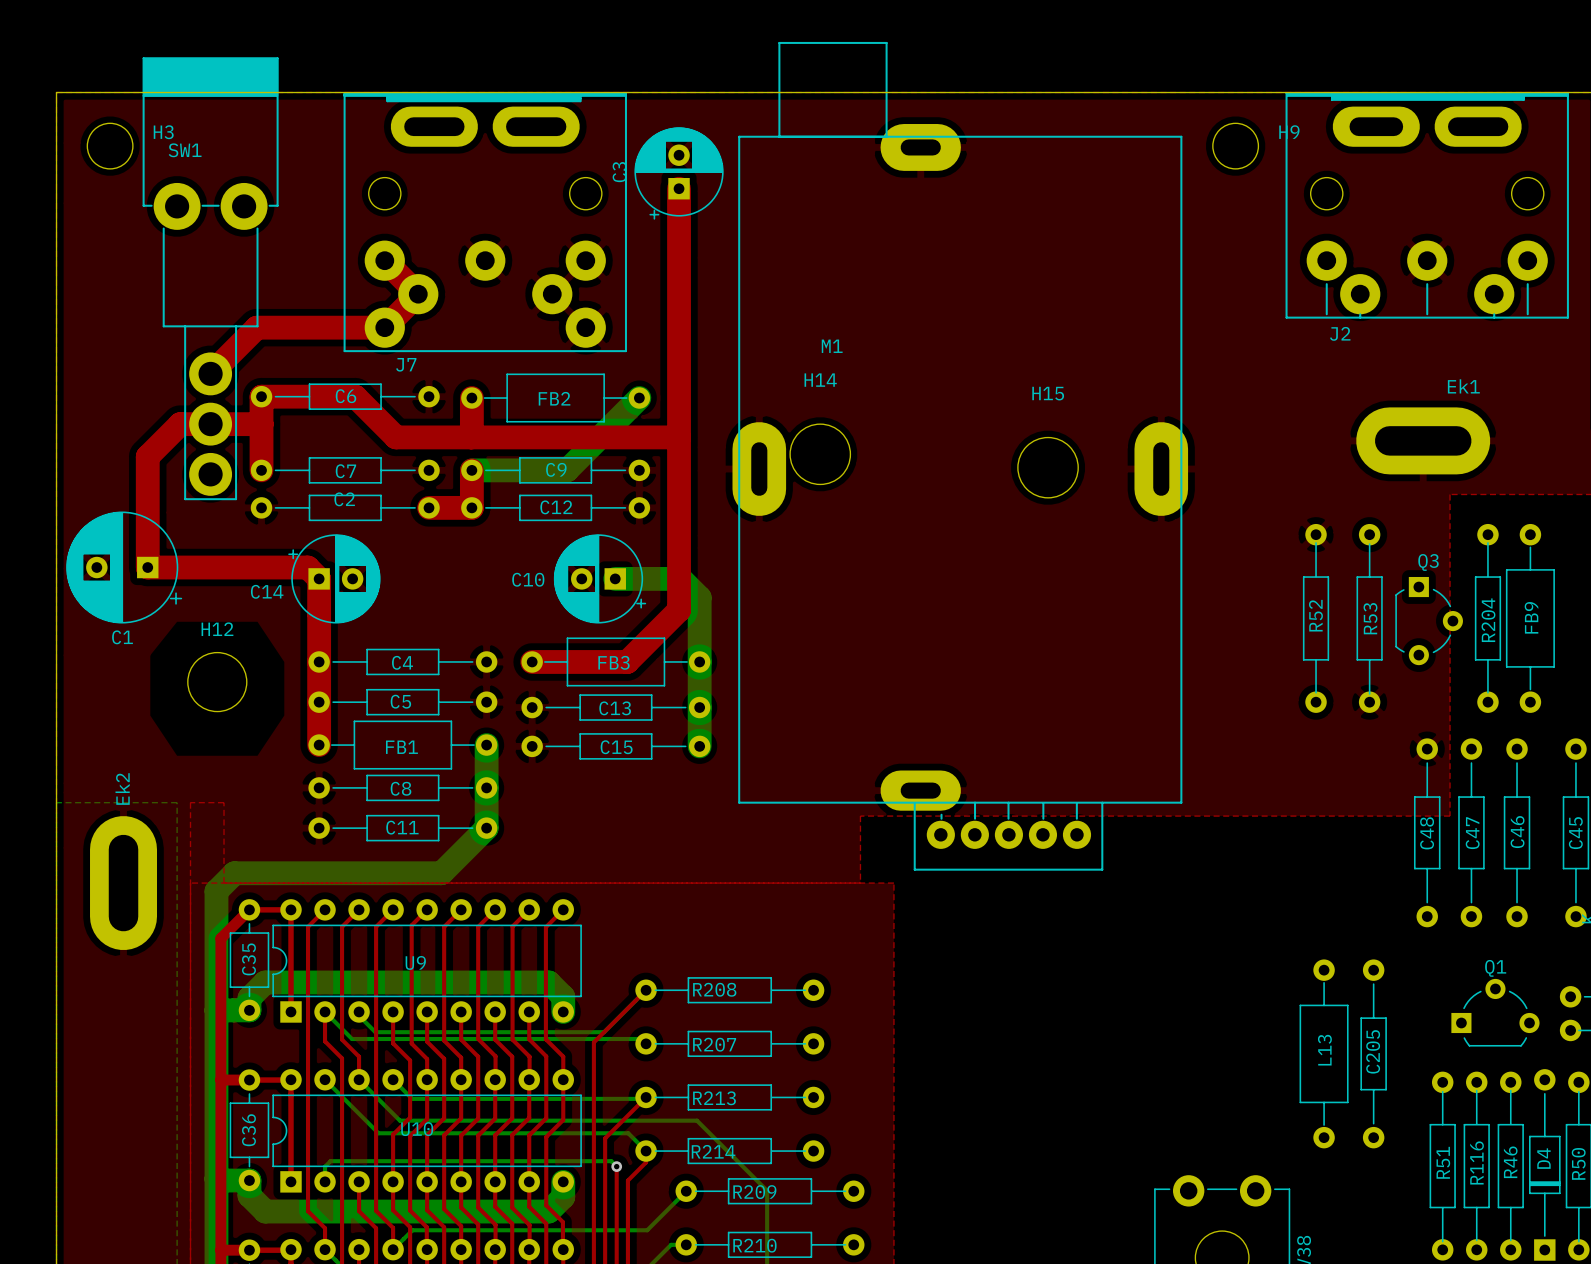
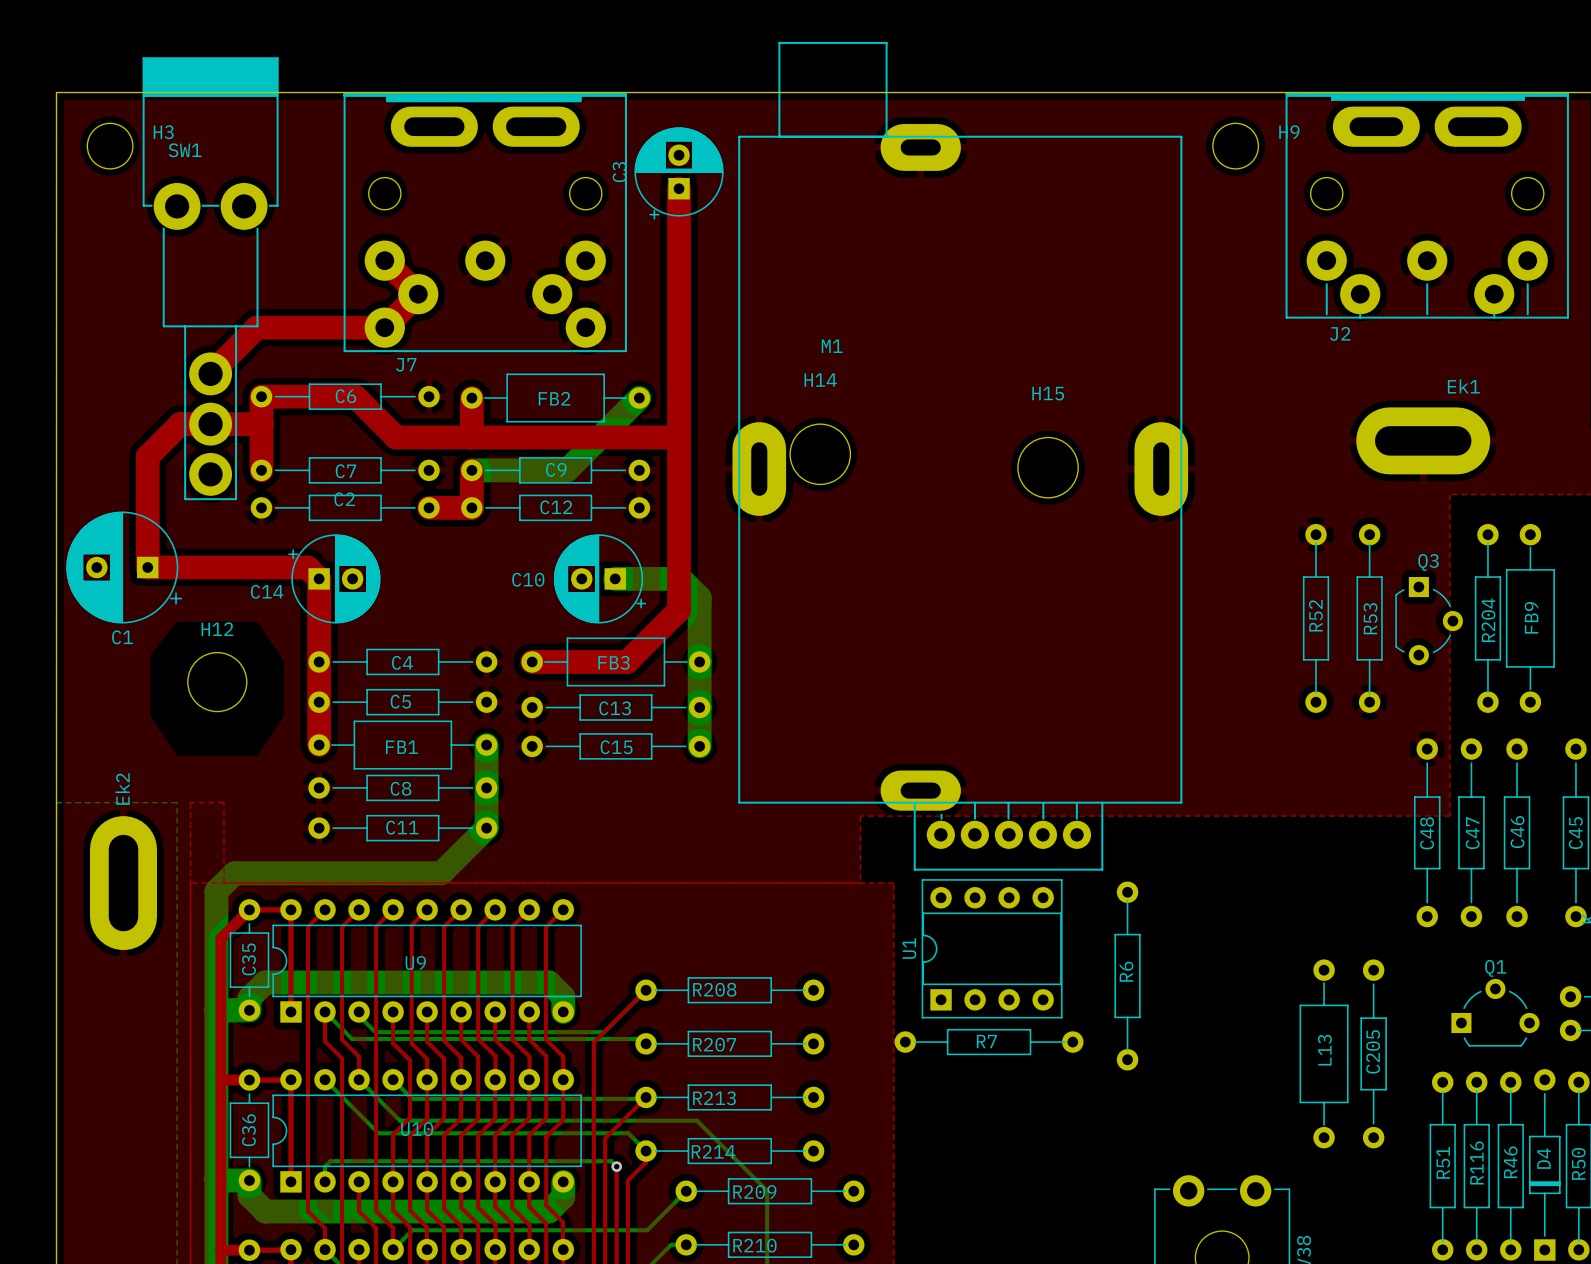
U1: none -> (992, 948)
R6: none -> (1127, 976)
R7: none -> (989, 1042)

